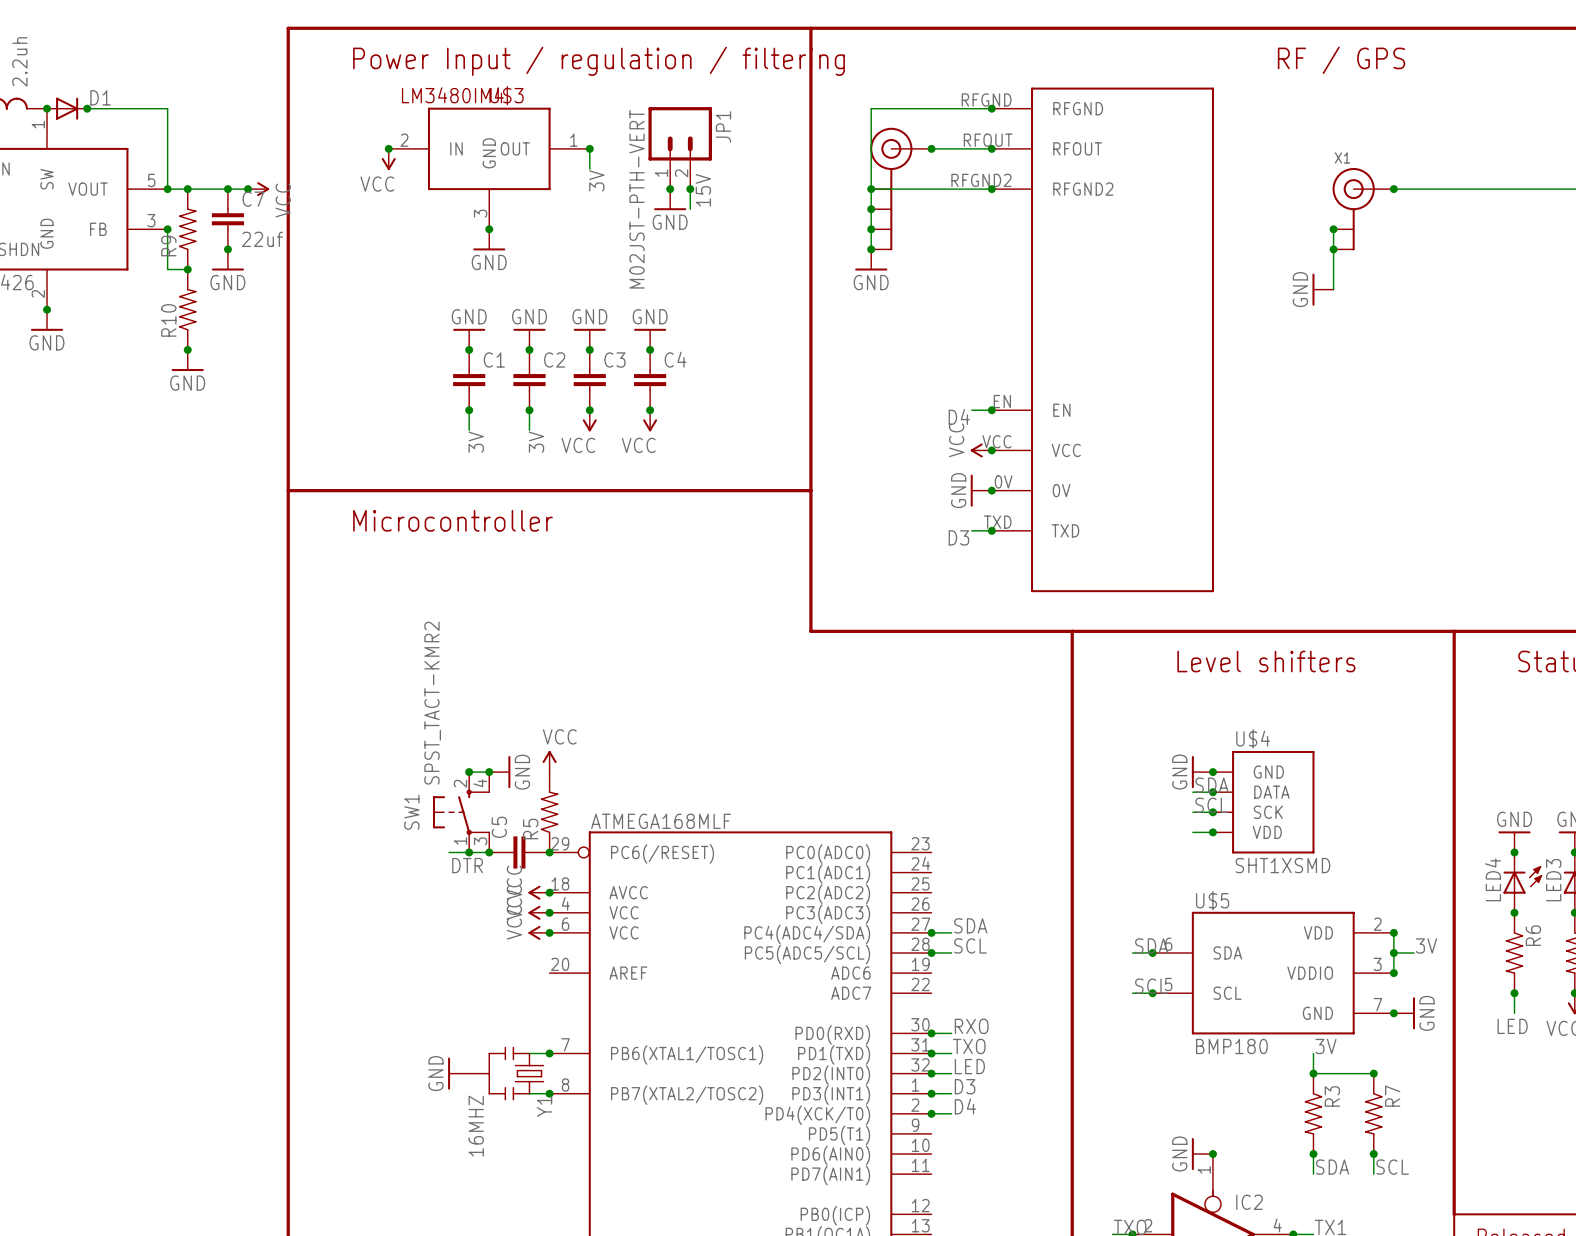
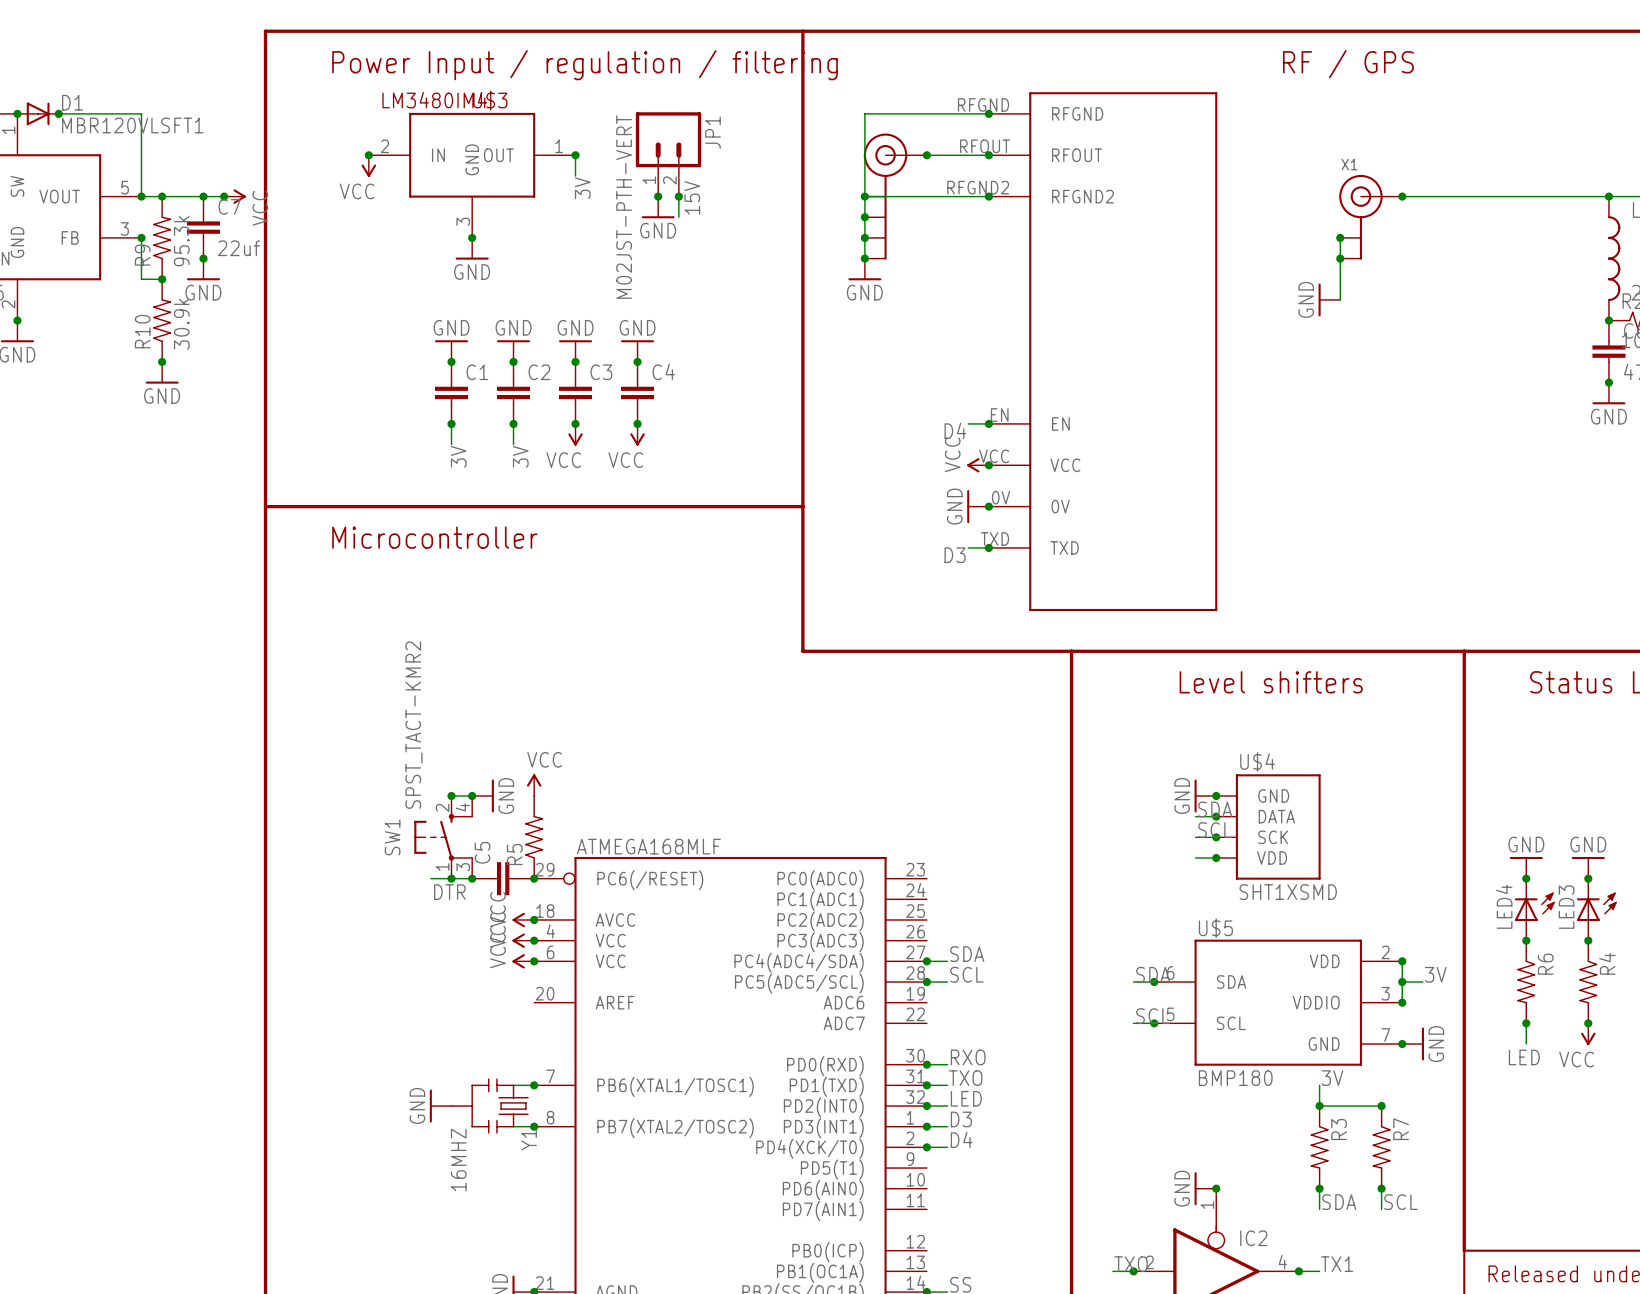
D1 value: none -> MBR120VLSFT1 (132, 125)
R9 value: none -> 95.3k (181, 241)
R10 value: none -> 30.9k (181, 324)

